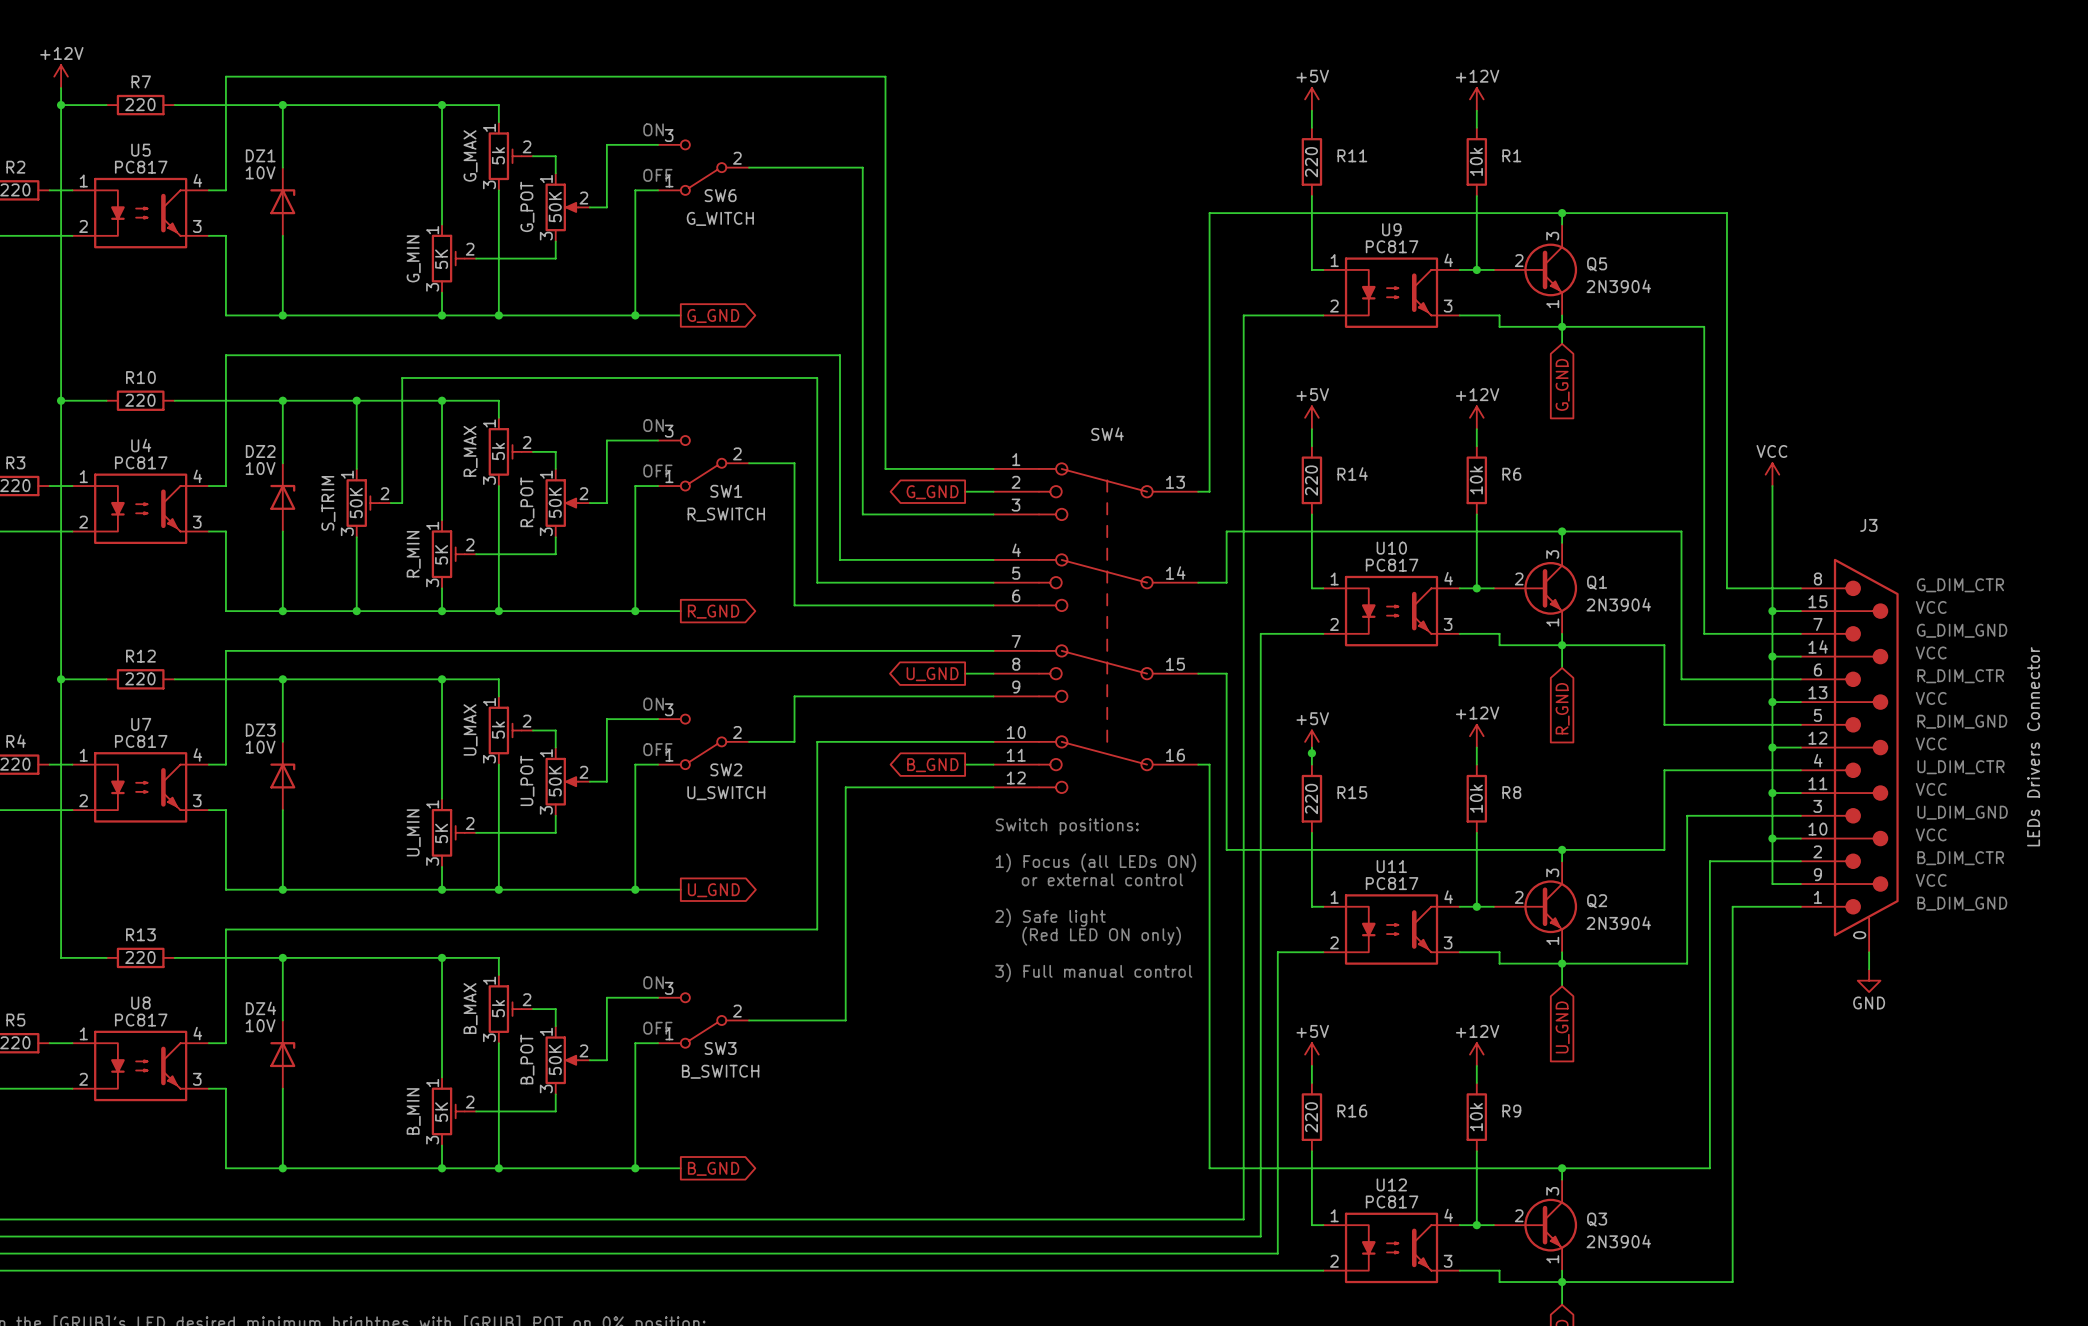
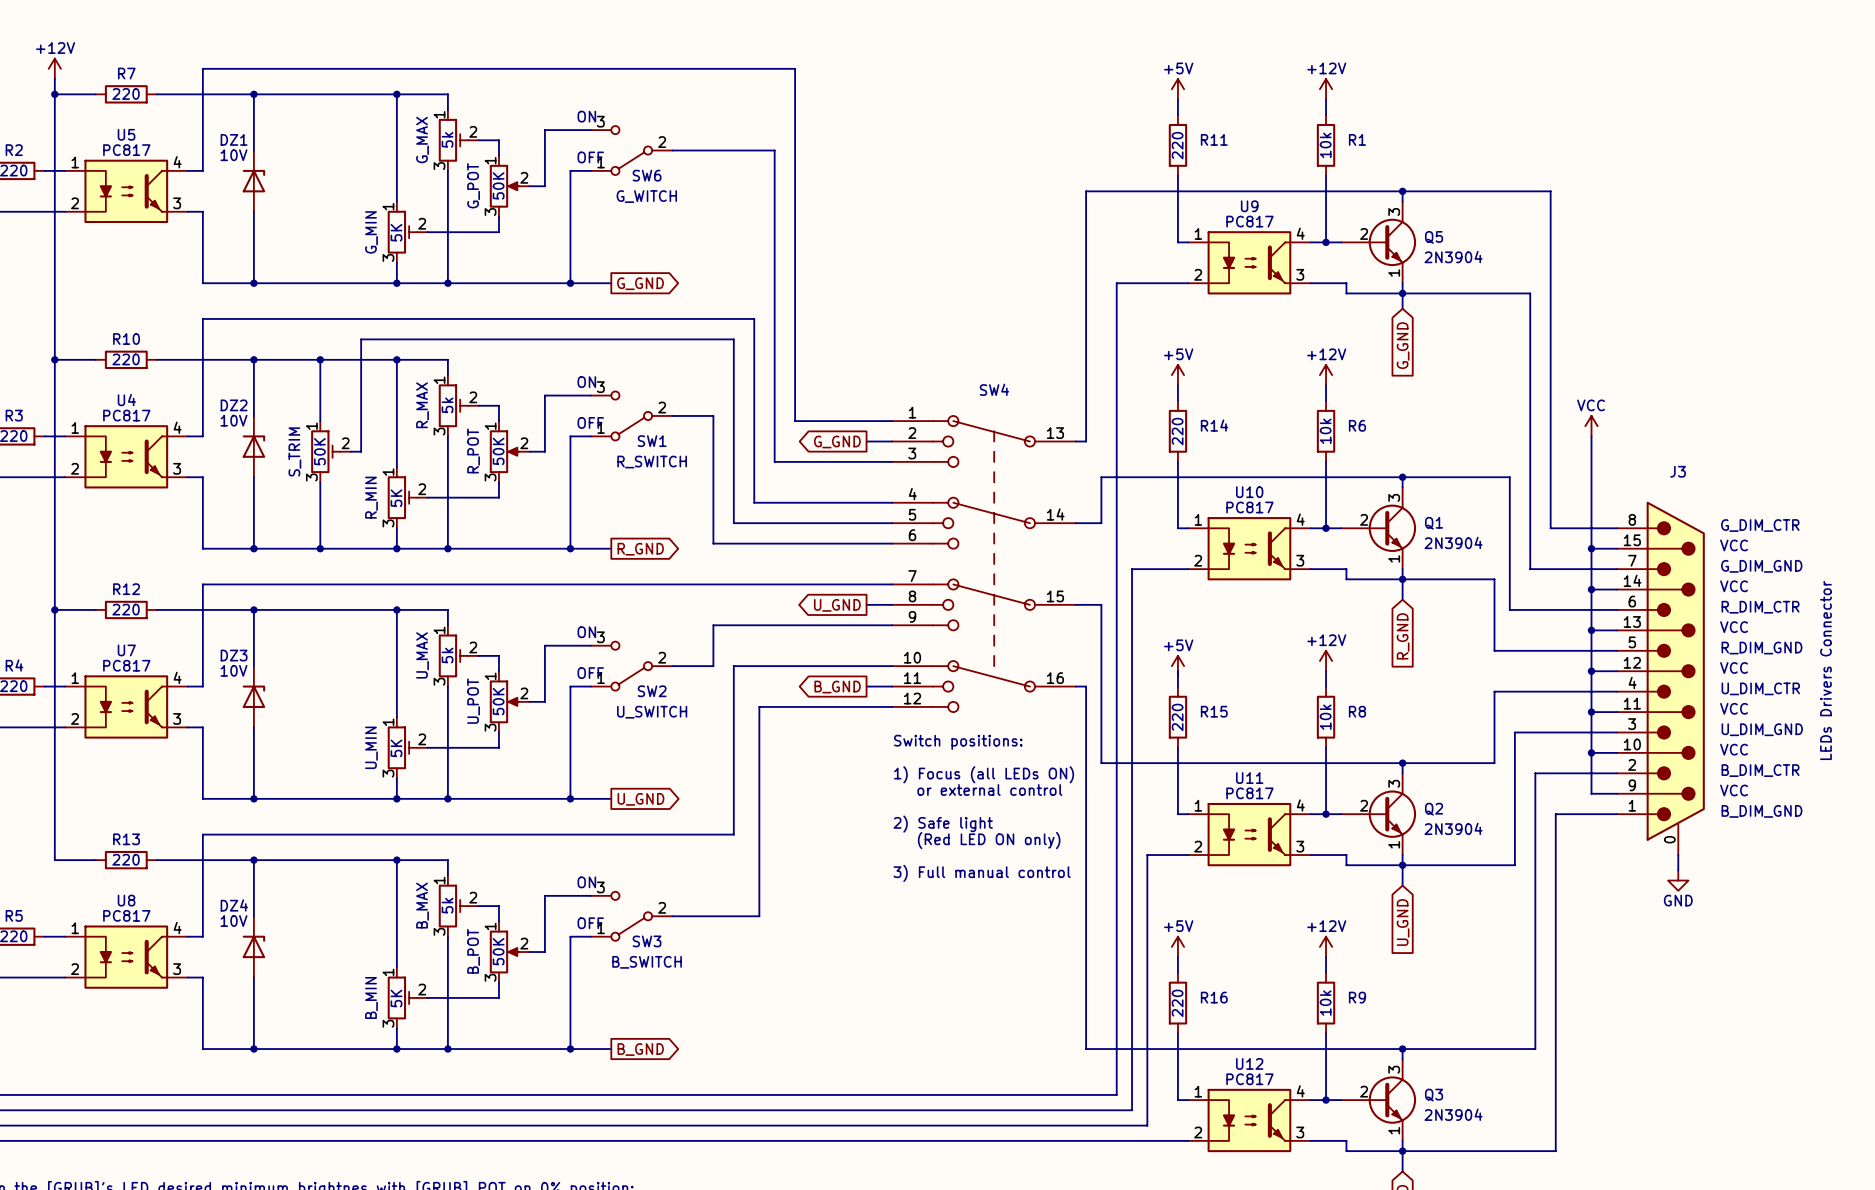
junction: (1311, 753) -> none

